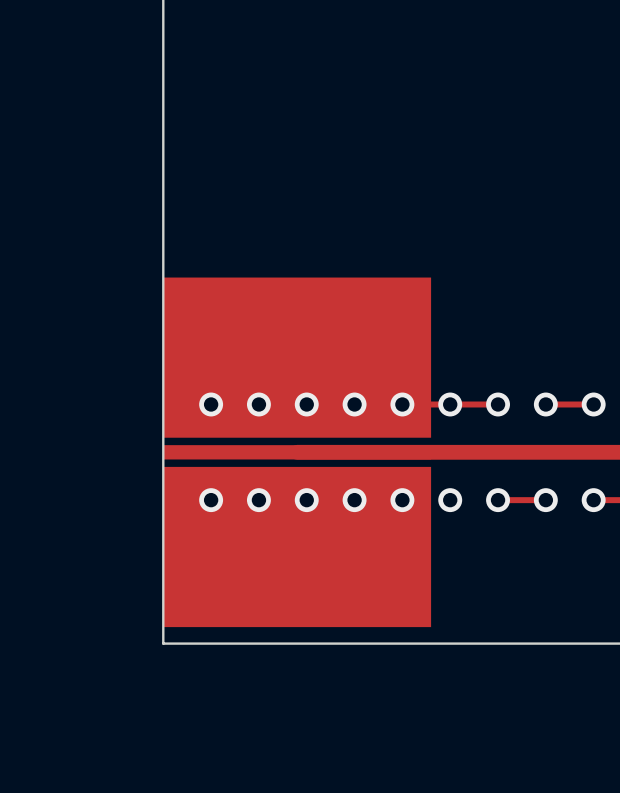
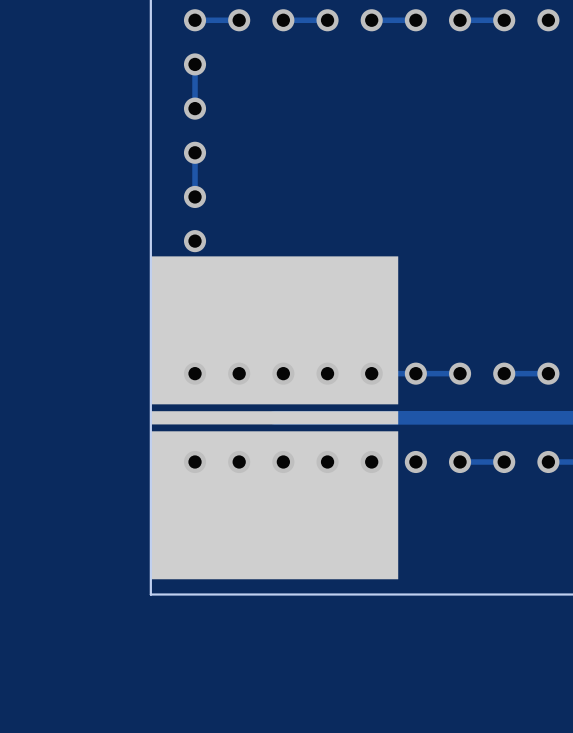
track: none -> (195, 20) (239, 20)
via: none -> (195, 20)
via: none -> (239, 20)
track: none -> (283, 20) (327, 20)
via: none -> (283, 20)
via: none -> (327, 20)
track: none -> (371, 20) (415, 20)
via: none -> (371, 20)
via: none -> (415, 20)
track: none -> (460, 20) (504, 20)
via: none -> (460, 20)
via: none -> (504, 20)
via: none -> (548, 20)
track: none -> (195, 64) (195, 108)
via: none -> (195, 64)
via: none -> (195, 108)
track: none -> (195, 152) (195, 196)
via: none -> (195, 152)
via: none -> (195, 196)
via: none -> (195, 241)

